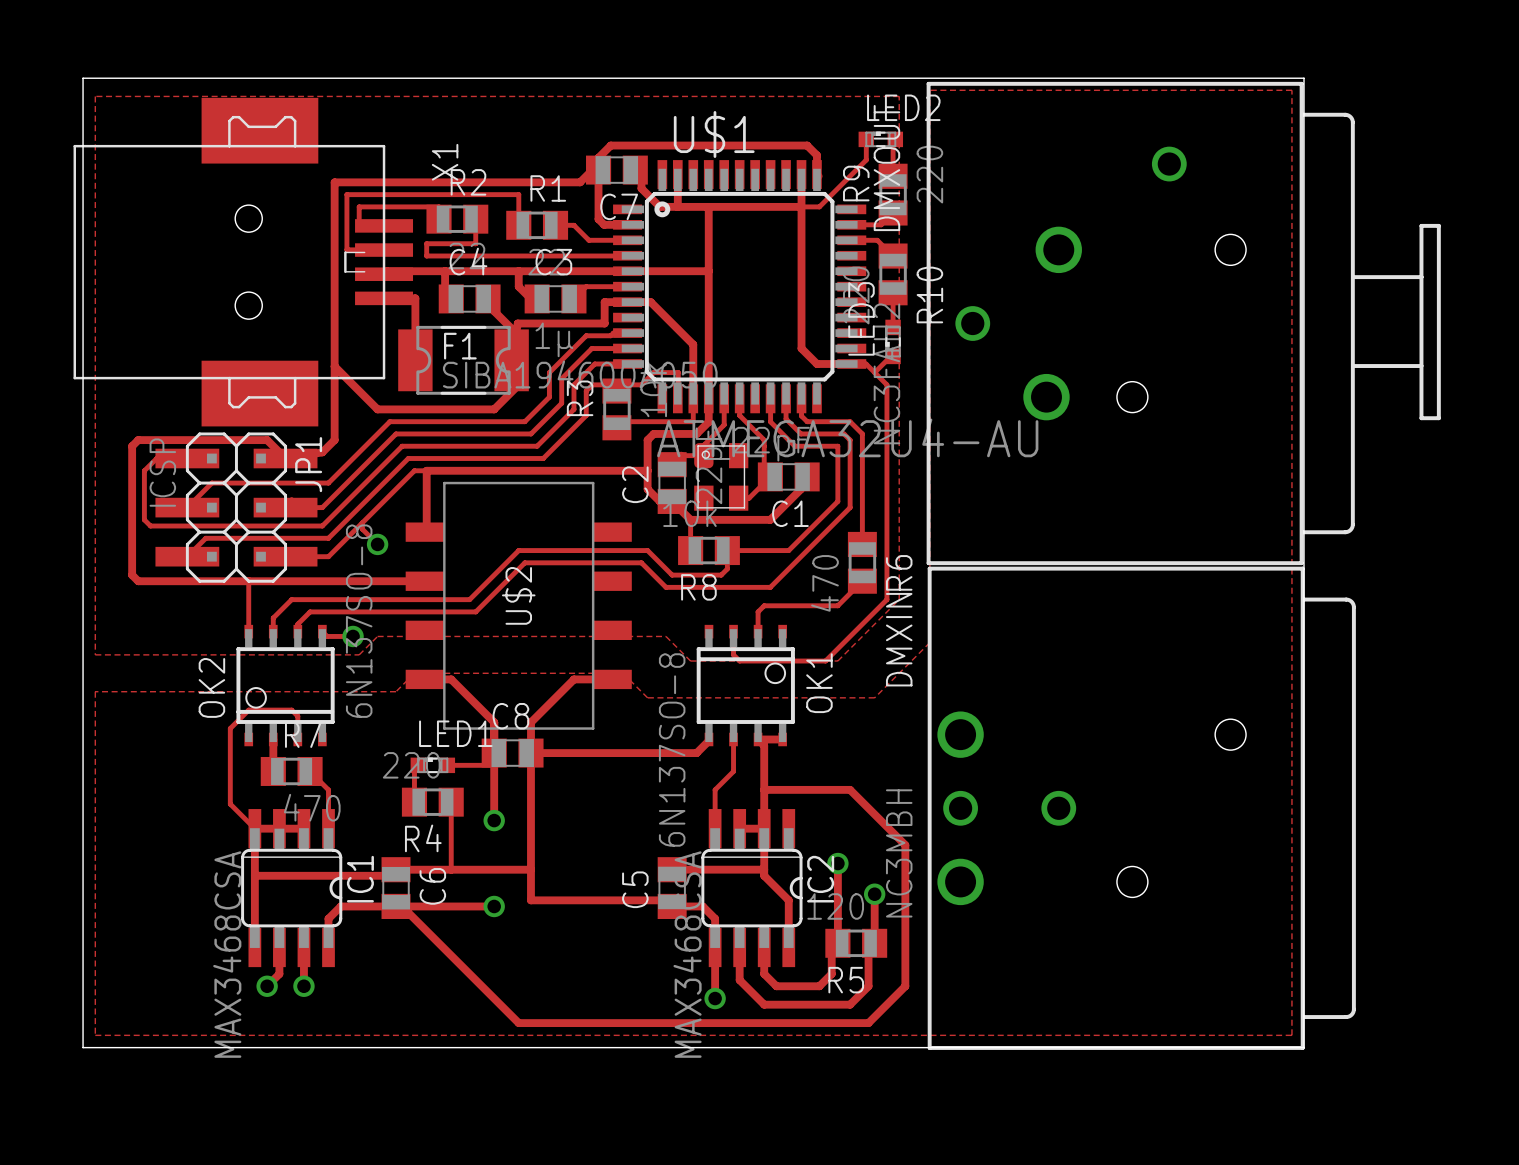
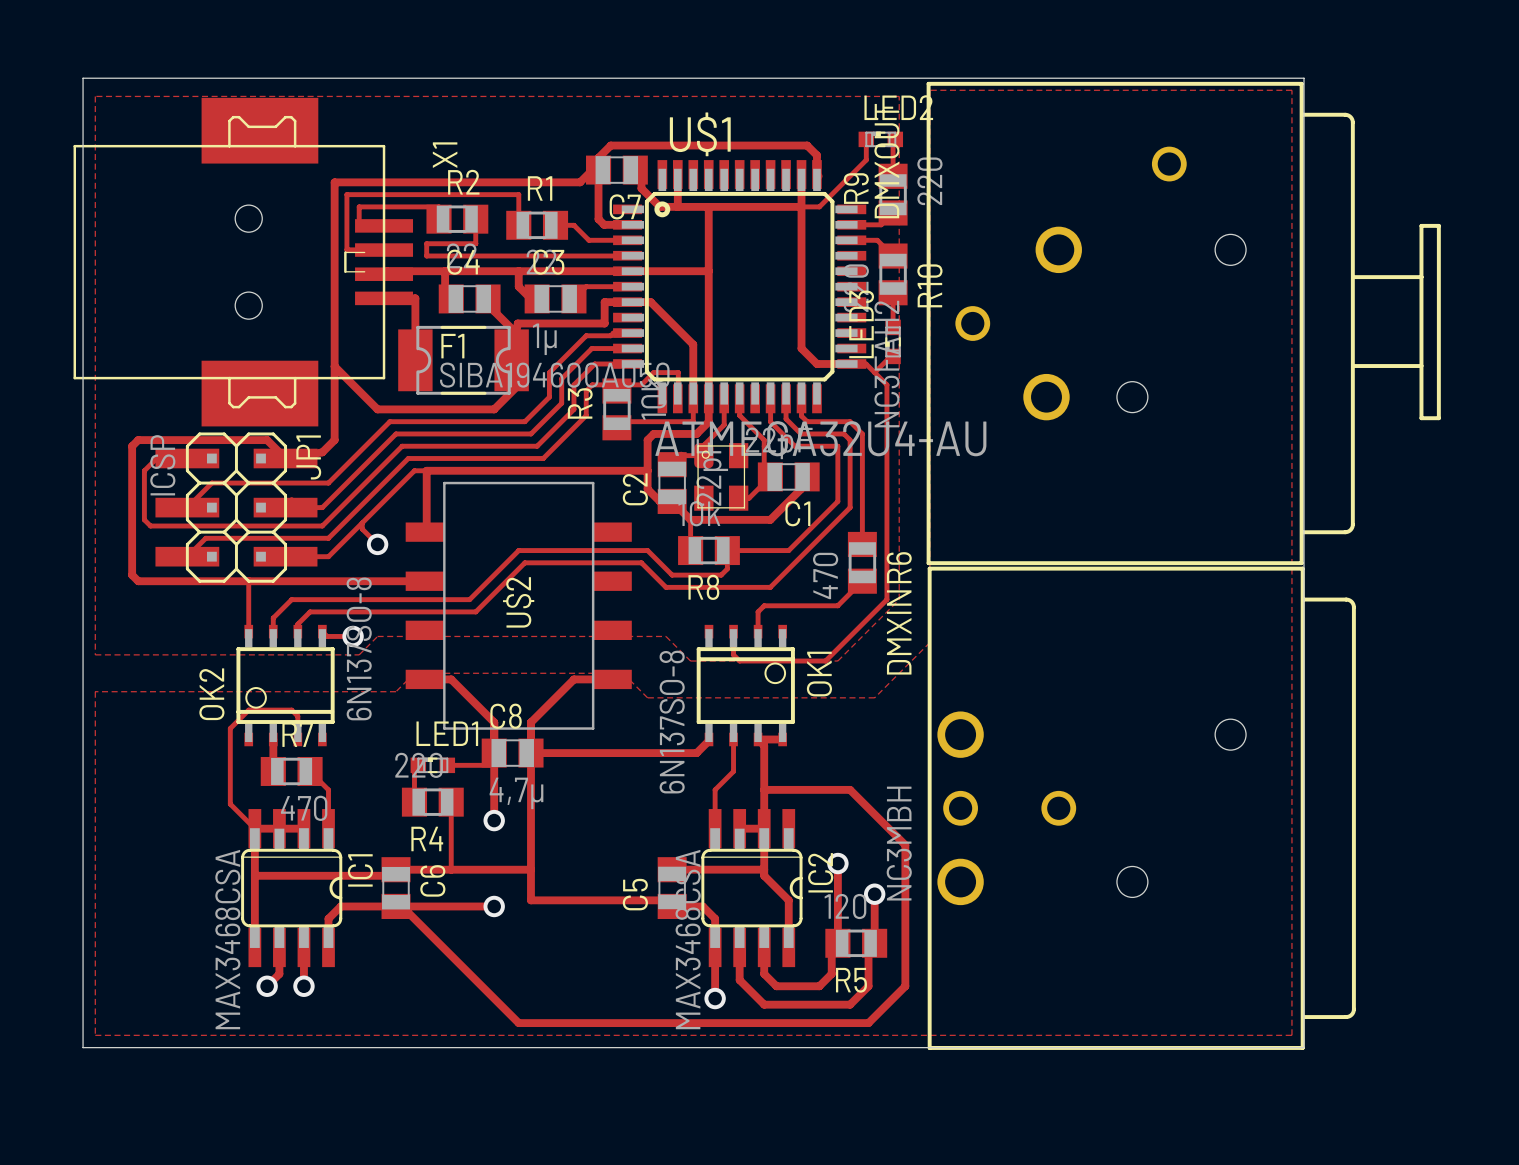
C8 value: none -> 4,7µ (516, 793)

